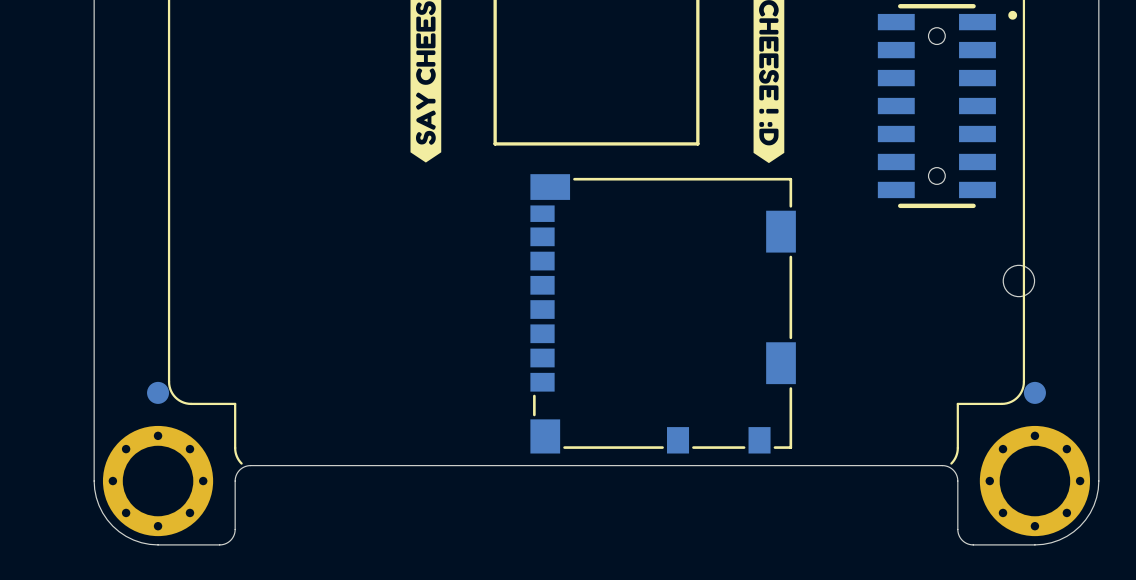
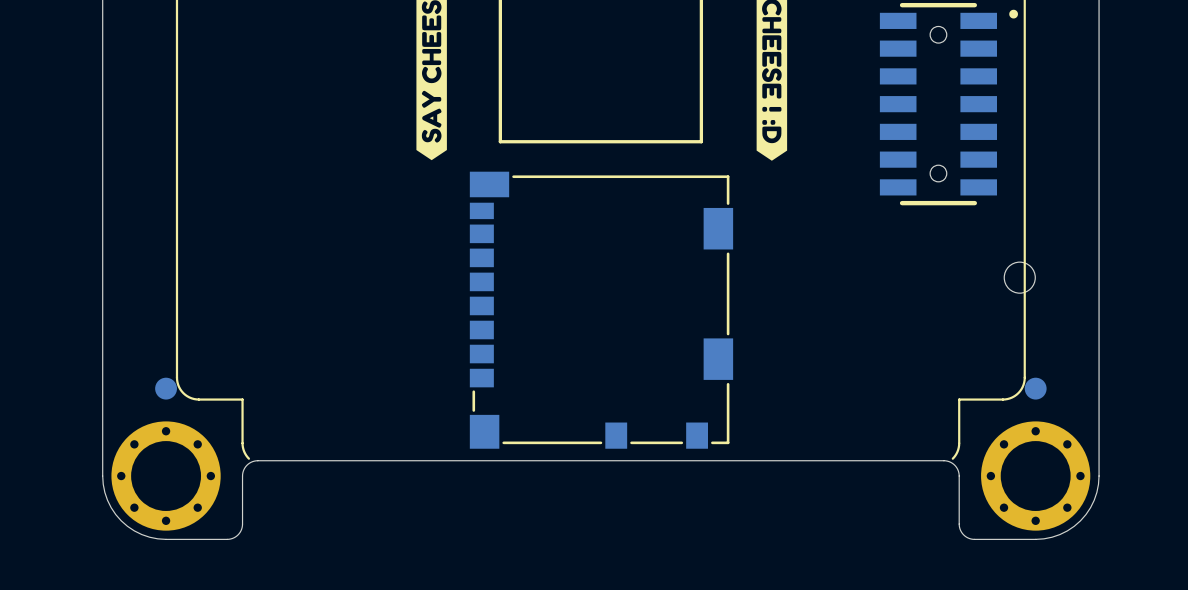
part position: (663, 313) -> (601, 310)

